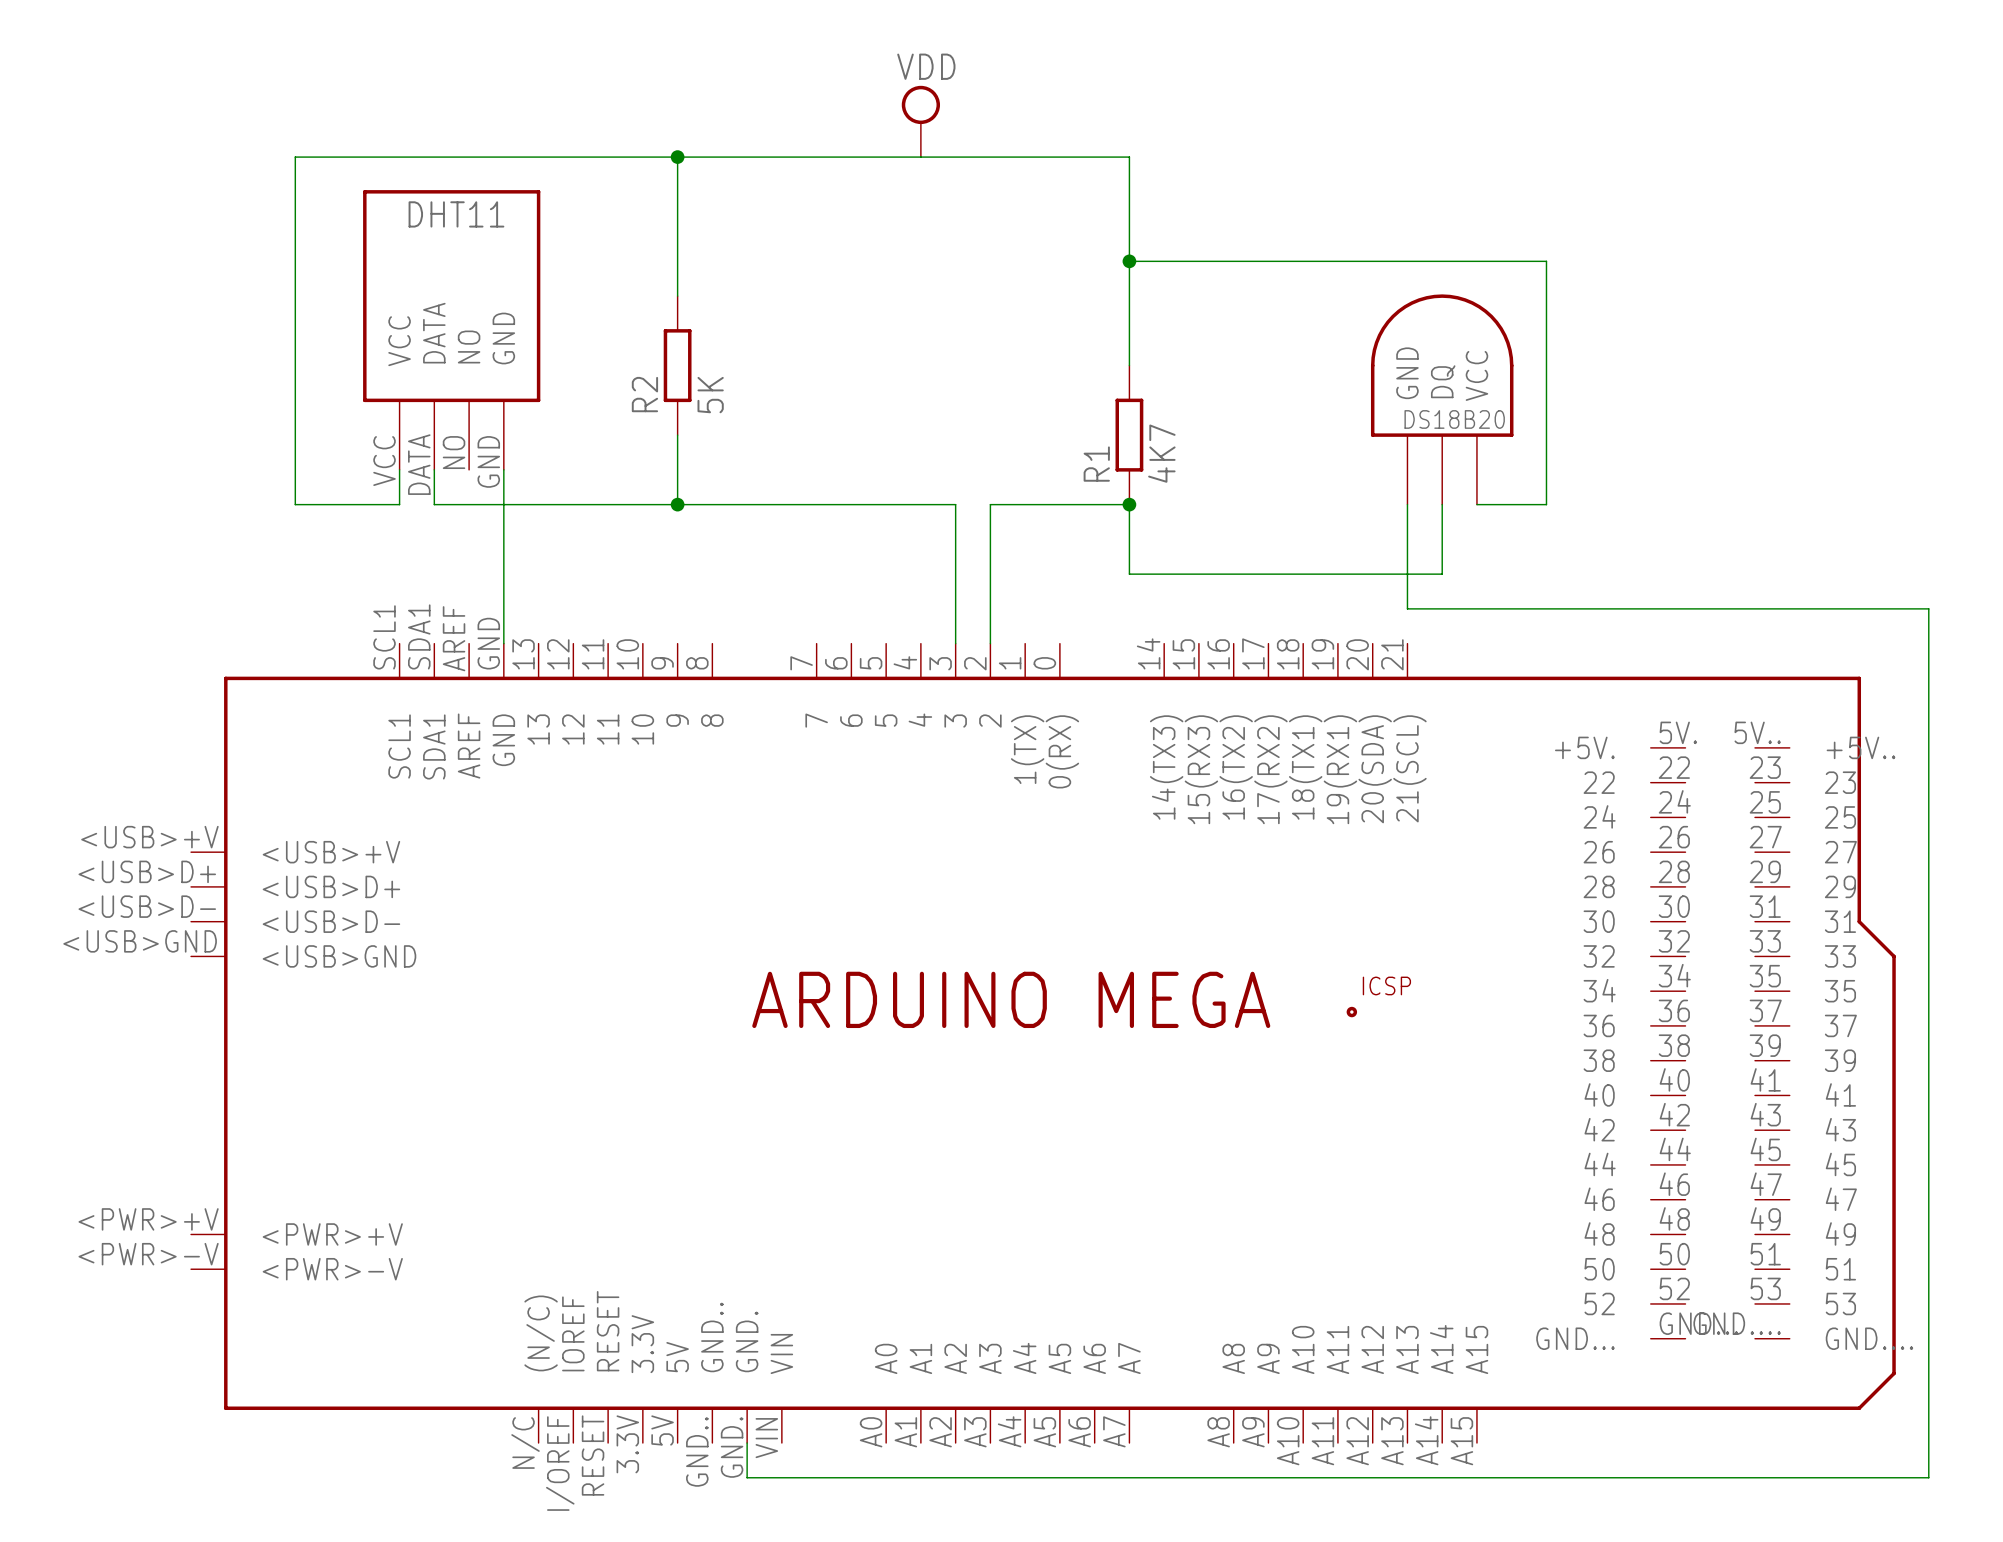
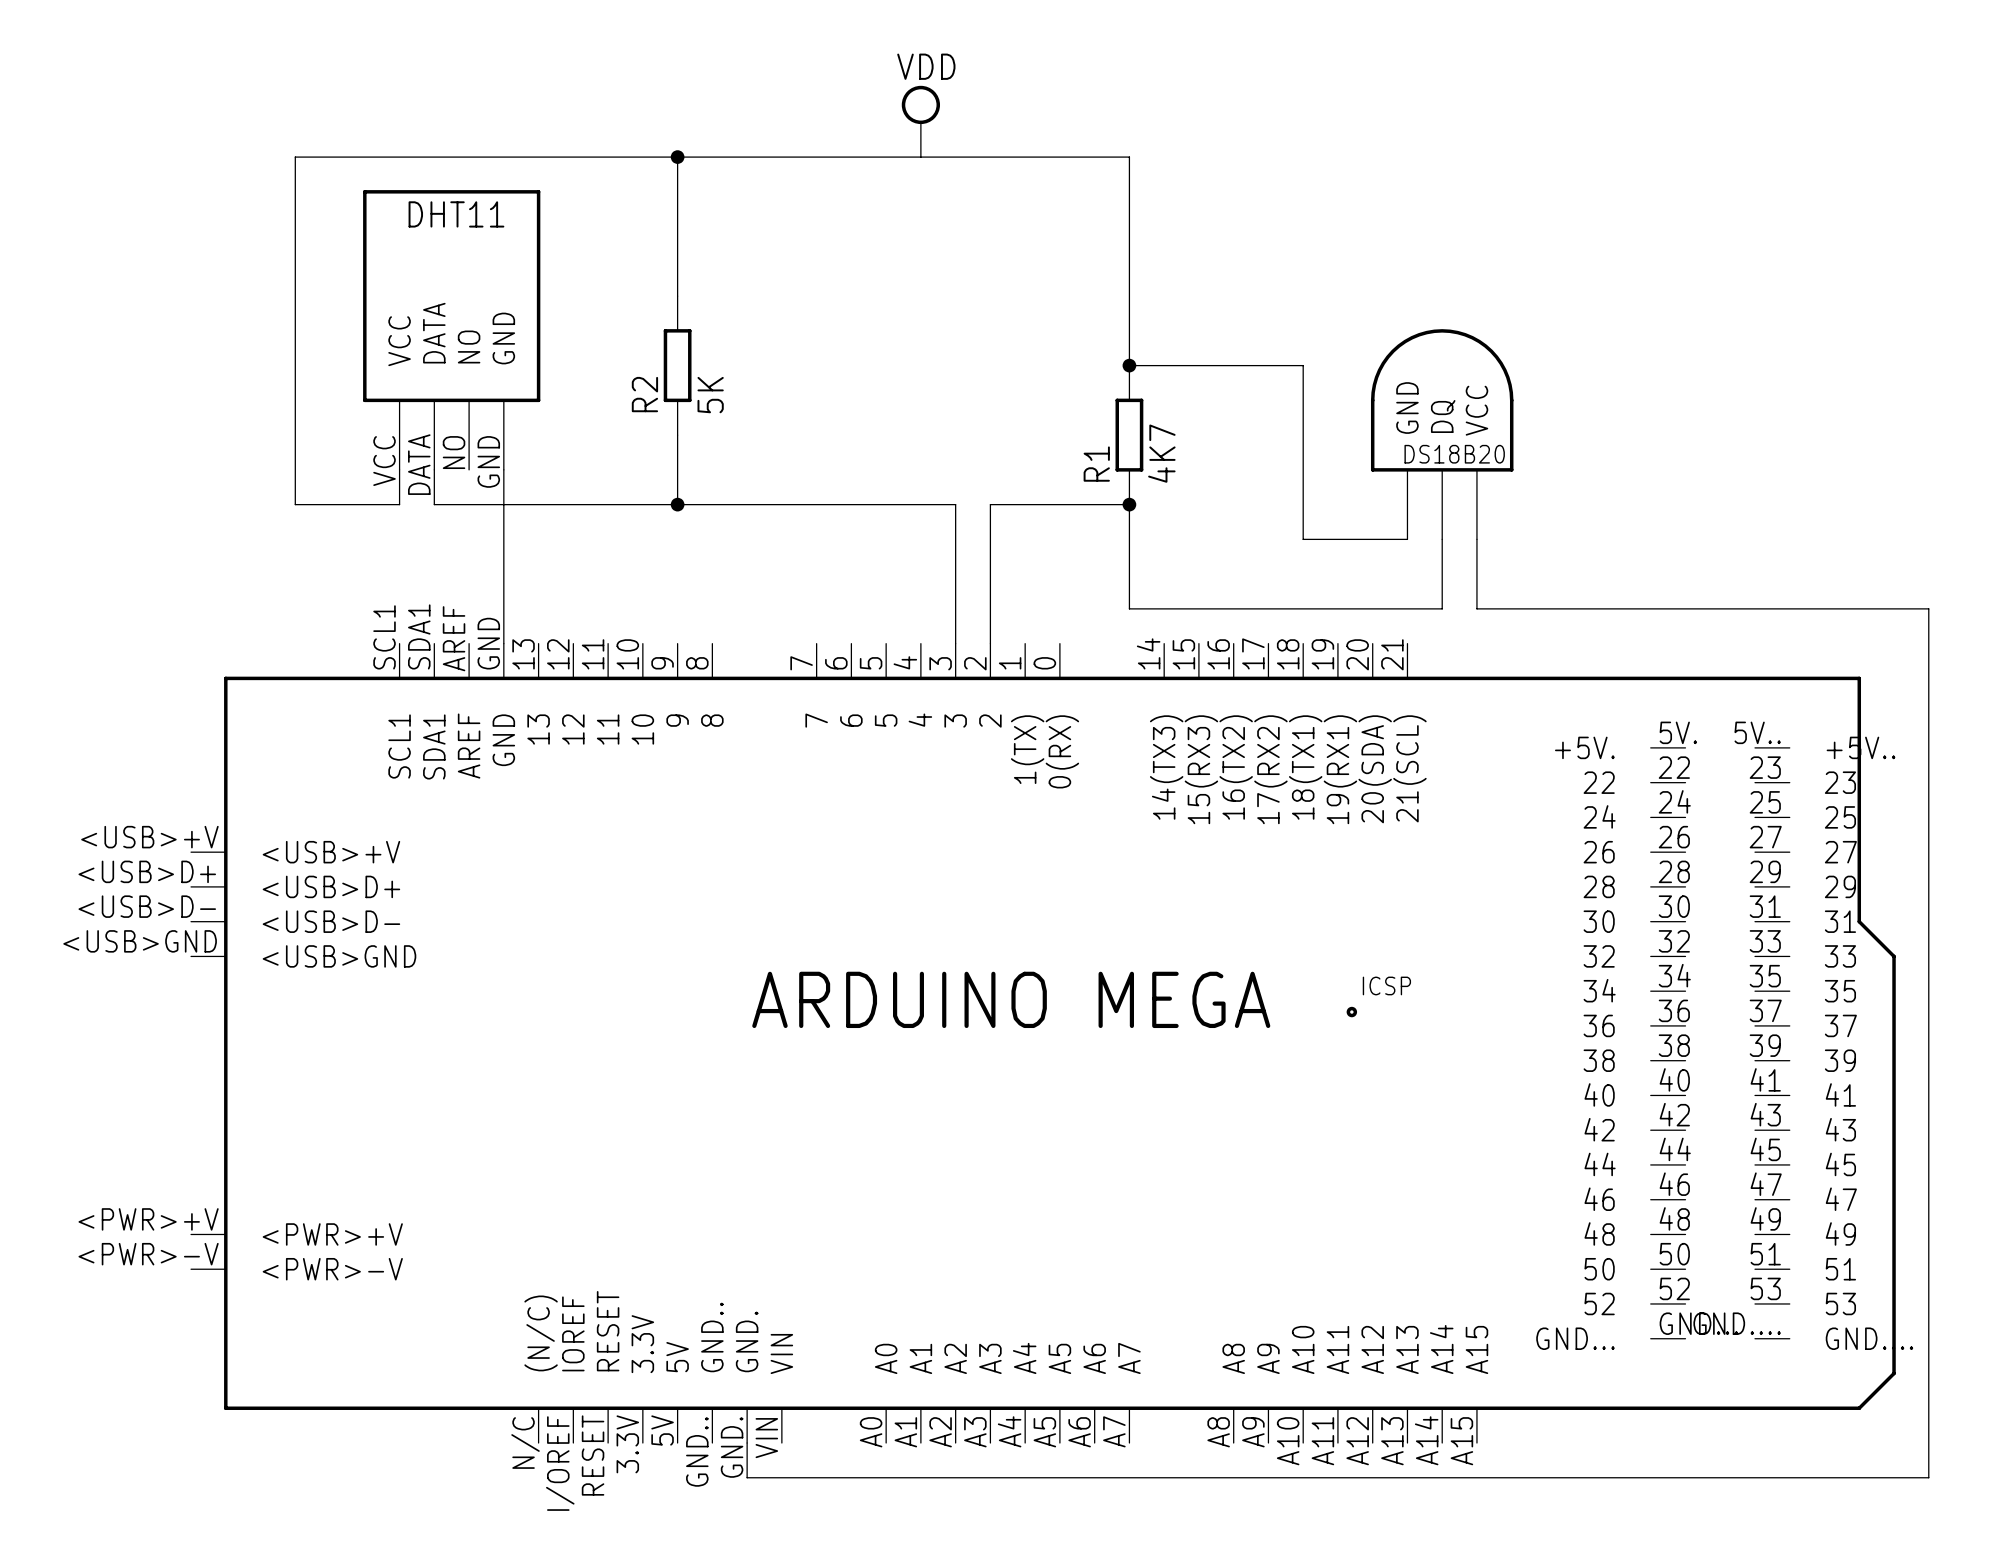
wire: (1129, 261) (1546, 261) (1546, 504) (1476, 504) -> none
junction: (1129, 261) -> none
wire: none -> (1129, 365) (1303, 365) (1303, 539) (1407, 539)
junction: none -> (1129, 365)
part position: (1442, 399) -> (1442, 434)
wire: (1407, 504) (1407, 608) -> none
wire: none -> (1476, 539) (1476, 608)
wire: (1129, 574) (1442, 574) -> (1129, 574) (1129, 608) (1407, 608)
wire: (1442, 608) (1476, 608) -> (1442, 608) (1442, 574)

